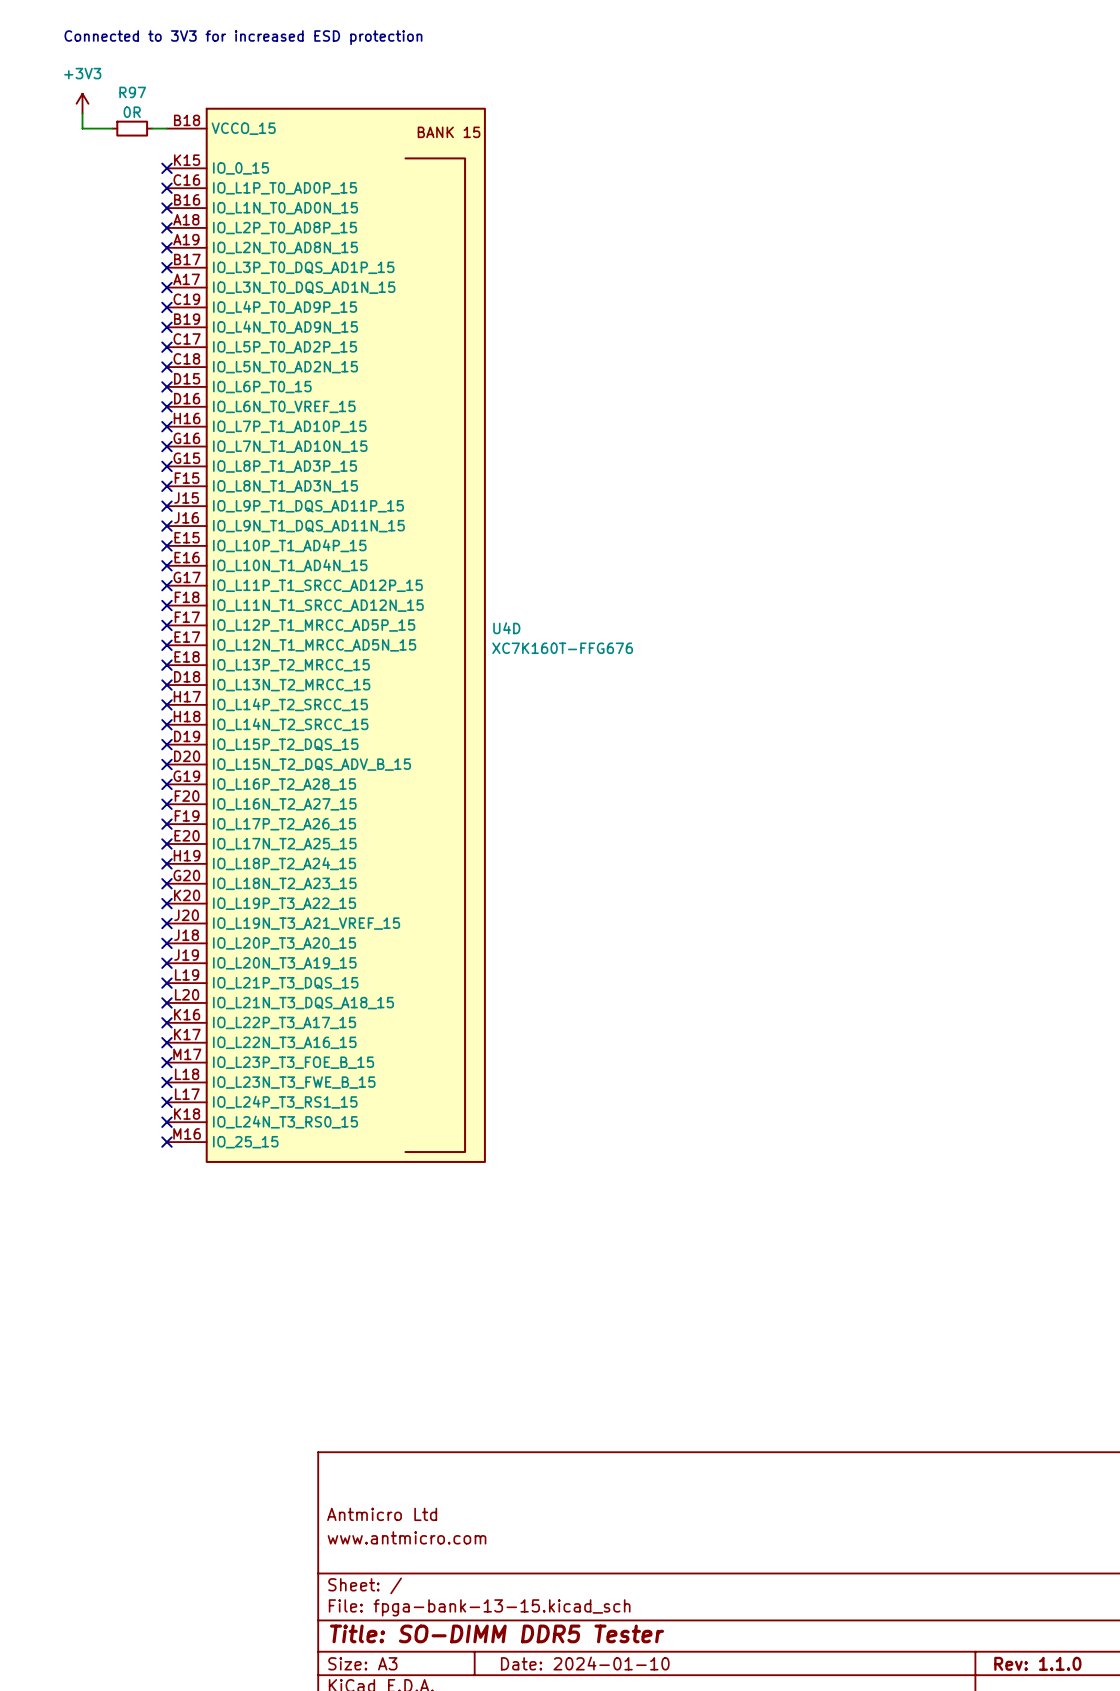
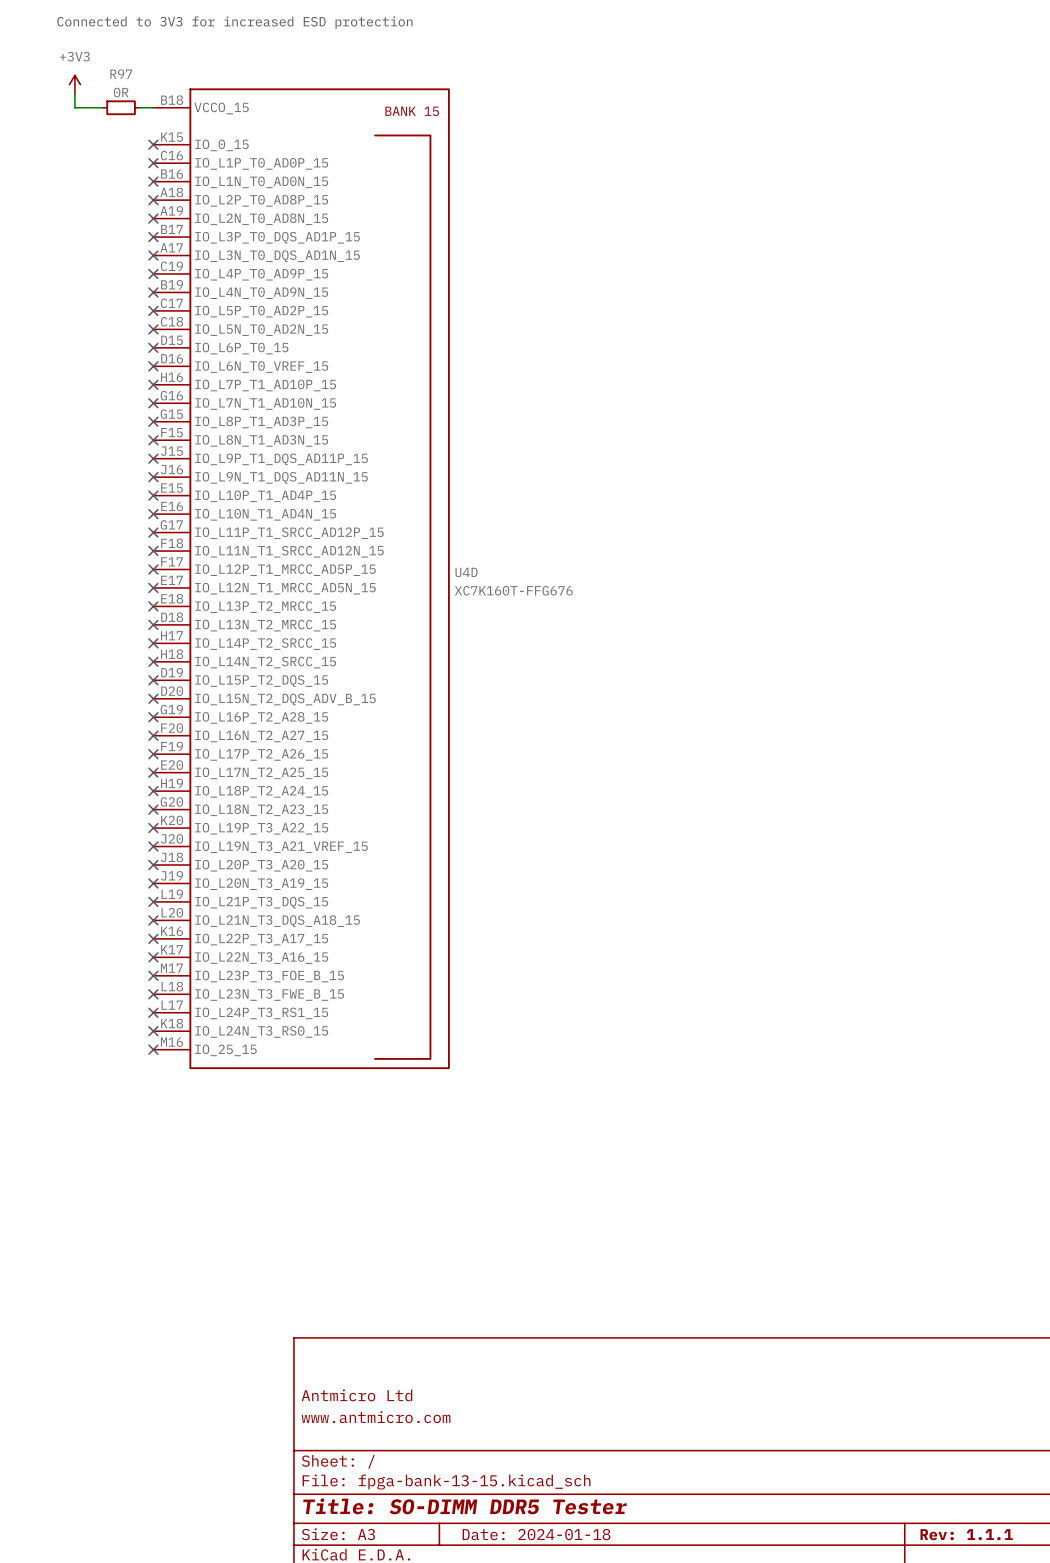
title block: Date: 2024-01-10 (585, 1663) -> Date: 2024-01-18 (536, 1534)
title block: Rev: 1.1.0 (1037, 1663) -> Rev: 1.1.1 (966, 1534)

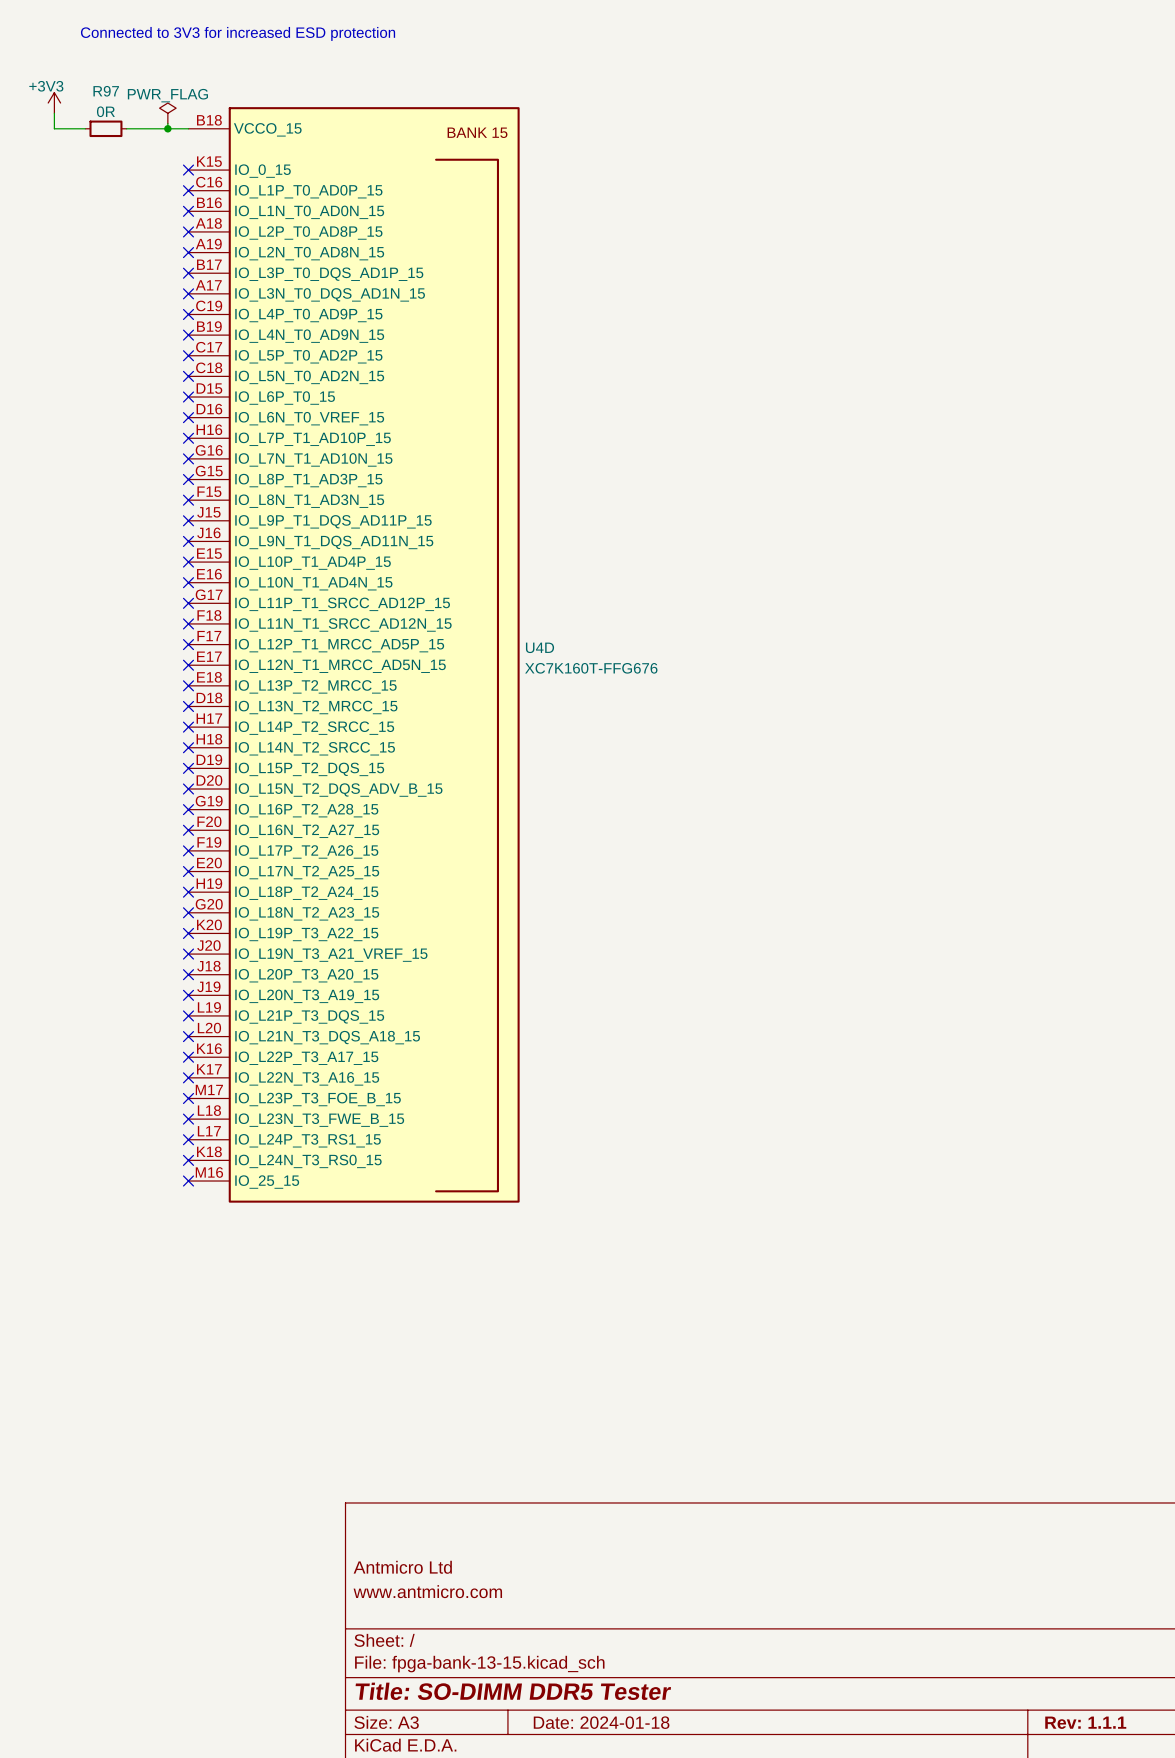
power symbol text position: +3V3 (74, 56) -> +3V3 (46, 86)
power symbol position: +3V3 (74, 84) -> +3V3 (54, 103)
wire: none -> (54, 113) (54, 128) (85, 128)
wire: (74, 93) (74, 107) (98, 107) -> none
power symbol: none -> PWR_FLAG (167, 113)
wire: none -> (131, 128) (173, 128)
R97 position: (121, 107) -> (105, 128)
junction: none -> (167, 128)

